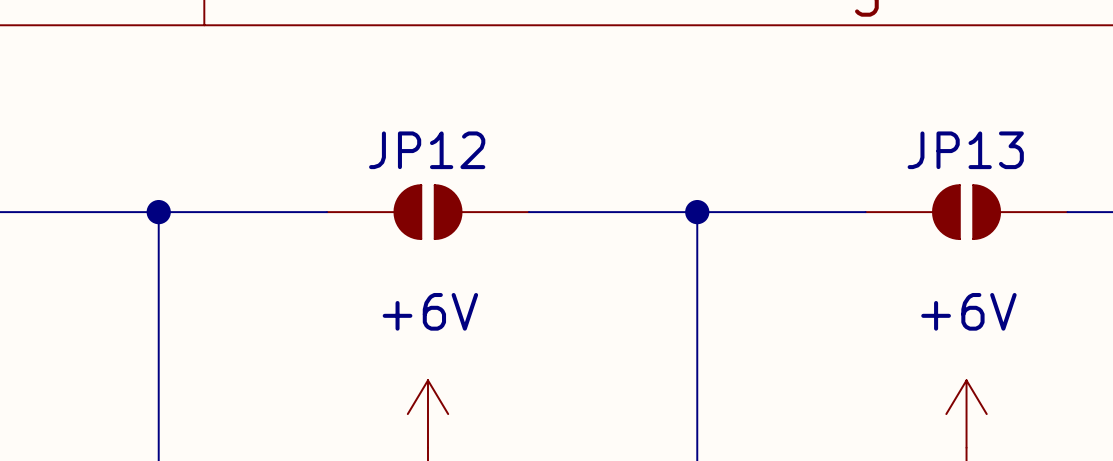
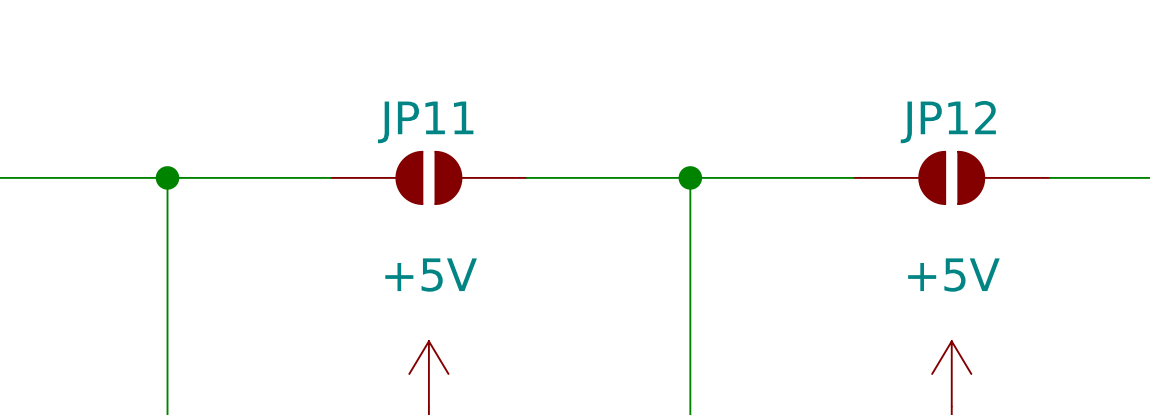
JP12 name: JP12 (427, 150) -> JP11 (425, 122)
JP13 name: JP13 (965, 150) -> JP12 (948, 122)
power symbol: +6V (427, 414) -> +5V (428, 373)
power symbol: +6V (966, 414) -> +5V (951, 373)

